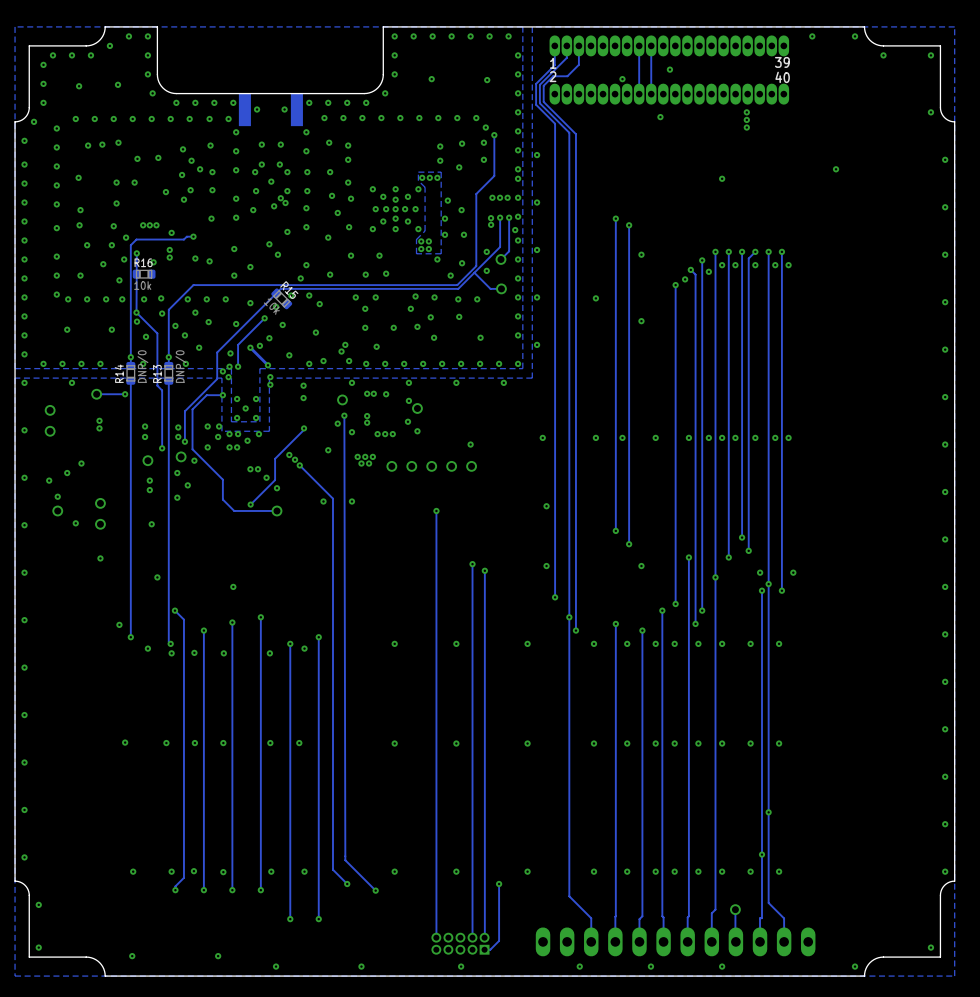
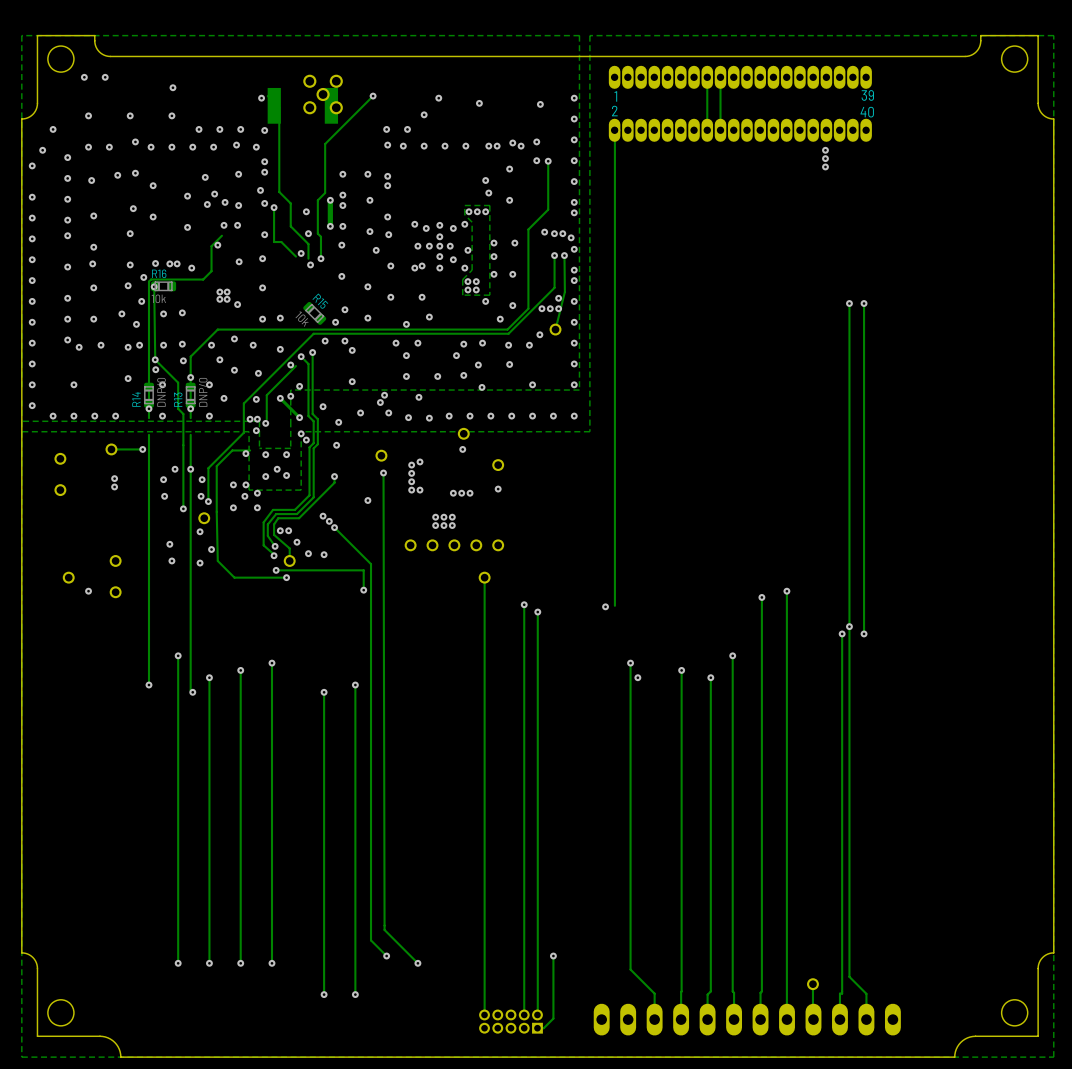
drawing: [14, 26, 956, 977] -> none
via: (128, 36) -> none
via: (147, 36) -> none
via: (394, 36) -> none
via: (413, 36) -> none
via: (432, 36) -> none
via: (451, 36) -> none
via: (470, 36) -> none
via: (489, 36) -> none
via: (508, 36) -> none
via: (812, 36) -> none
via: (855, 36) -> none
via: (109, 45) -> none
zone outline: (522, 45) (522, 26) (15, 26) (15, 45) -> (579, 35) (21, 35)
track: (554, 45) (554, 65) (536, 83) (536, 104) (555, 123) (555, 132) -> none
track: (566, 45) (566, 57) (539, 84) (539, 103) (569, 132) (569, 617) -> none
track: (578, 45) (578, 64) (567, 76) (553, 76) (543, 85) (543, 101) (575, 134) (575, 630) -> none
track: (639, 45) (639, 83) -> (707, 88) (707, 130)
track: (651, 45) (651, 83) -> (720, 88) (720, 130)
zone outline: (954, 45) (954, 26) (532, 26) (532, 45) -> (1053, 35) (589, 35)
via: (52, 55) -> none
via: (71, 55) -> none
via: (90, 55) -> none
via: (147, 55) -> none
via: (394, 55) -> none
via: (518, 55) -> none
via: (883, 55) -> none
via: (930, 55) -> none
via: (43, 64) -> none
via: (669, 69) -> none
part position: (669, 70) -> (740, 103)
via: (147, 74) -> none
via: (394, 74) -> none
via: (518, 74) -> none
via: (431, 79) -> none
via: (622, 79) -> none
via: (487, 80) -> none
via: (43, 83) -> none
via: none -> (84, 77)
via: none -> (105, 77)
via: (118, 84) -> none
via: (79, 86) -> none
via: (385, 93) -> none
via: (518, 93) -> none
part: none -> (323, 94)
track: none -> (267, 96) (279, 107) (279, 191) (290, 203) (290, 226) (308, 244) (308, 258)
track: none -> (373, 96) (325, 144) (325, 193) (317, 200) (317, 233) (320, 236) (320, 258)
via: none -> (373, 96)
via: (43, 102) -> none
via: (176, 102) -> none
via: (195, 102) -> none
via: (214, 102) -> none
via: (309, 102) -> none
via: (328, 102) -> none
via: (347, 102) -> none
via: (366, 102) -> none
via: none -> (438, 98)
via: none -> (574, 98)
via: none -> (479, 103)
via: none -> (540, 104)
via: (257, 109) -> none
via: (284, 109) -> none
via: (518, 112) -> none
via: (746, 112) -> none
via: (930, 112) -> none
via: (660, 117) -> none
via: (94, 118) -> none
via: (132, 118) -> none
via: (170, 118) -> none
via: (189, 118) -> none
via: (209, 118) -> none
via: (228, 118) -> none
via: (324, 118) -> none
via: (343, 118) -> none
via: (362, 118) -> none
via: (400, 118) -> none
via: (419, 118) -> none
via: (438, 118) -> none
via: (457, 118) -> none
via: (476, 118) -> none
via: (746, 119) -> none
via: (34, 121) -> none
via: none -> (574, 119)
via: (485, 127) -> none
via: (746, 127) -> none
via: (56, 128) -> none
via: none -> (53, 129)
via: none -> (199, 129)
via: none -> (219, 129)
via: none -> (240, 129)
via: none -> (386, 129)
via: none -> (407, 129)
via: (518, 131) -> none
via: (306, 132) -> none
track: (494, 135) (494, 160) -> none
via: (494, 135) -> none
via: (24, 140) -> none
via: none -> (574, 139)
via: (329, 142) -> none
via: (102, 144) -> none
via: (261, 144) -> none
via: (280, 144) -> none
via: (88, 145) -> none
via: none -> (403, 146)
via: none -> (424, 146)
via: none -> (445, 146)
via: none -> (465, 146)
via: none -> (497, 146)
via: none -> (521, 146)
via: (56, 147) -> none
via: none -> (88, 147)
via: none -> (109, 147)
via: none -> (151, 147)
via: none -> (171, 147)
via: none -> (192, 147)
via: none -> (213, 147)
via: none -> (256, 147)
via: (183, 149) -> none
via: none -> (42, 150)
via: (518, 150) -> none
via: none -> (825, 150)
via: (236, 151) -> none
via: (306, 151) -> none
via: (537, 155) -> none
via: none -> (67, 157)
via: (158, 157) -> none
via: none -> (825, 158)
via: (137, 158) -> none
via: (348, 159) -> none
via: none -> (574, 160)
via: (945, 159) -> none
via: (191, 160) -> none
via: none -> (264, 161)
via: (440, 160) -> none
via: none -> (548, 161)
via: (261, 164) -> none
via: (279, 164) -> none
via: none -> (825, 166)
via: (56, 166) -> none
via: (200, 169) -> none
via: (518, 169) -> none
via: (836, 169) -> none
via: none -> (135, 173)
via: (255, 172) -> none
via: (287, 172) -> none
via: none -> (117, 175)
via: none -> (387, 176)
via: none -> (67, 178)
track: (494, 175) (476, 193) (476, 222) -> (548, 178) (548, 209) (528, 229)
via: (422, 177) -> none
via: (429, 177) -> none
via: (722, 178) -> none
via: (271, 181) -> none
via: (116, 182) -> none
via: (24, 183) -> none
via: (56, 185) -> none
via: none -> (260, 190)
via: (372, 189) -> none
via: (395, 189) -> none
via: (418, 189) -> none
via: none -> (488, 193)
via: (212, 190) -> none
via: (256, 191) -> none
via: (287, 191) -> none
via: none -> (32, 197)
via: none -> (67, 199)
track: none -> (330, 200) (330, 226)
via: none -> (330, 200)
via: none -> (509, 200)
via: (383, 196) -> none
via: (407, 196) -> none
via: none -> (225, 202)
via: (492, 197) -> none
via: (500, 197) -> none
via: (507, 197) -> none
via: (280, 198) -> none
via: (351, 198) -> none
via: (395, 199) -> none
via: none -> (238, 205)
via: none -> (342, 205)
zone outline: (441, 200) (441, 172) (418, 172) (418, 180) (425, 187) (425, 215) -> (489, 205) (464, 205) (464, 214) (472, 222)
via: (447, 200) -> none
via: (24, 202) -> none
track: none -> (274, 207) (274, 242) (281, 242) (295, 256)
via: none -> (274, 207)
via: (285, 202) -> none
via: (537, 202) -> none
via: (56, 204) -> none
via: none -> (468, 211)
via: none -> (477, 211)
via: none -> (485, 211)
via: none -> (574, 212)
via: (945, 207) -> none
via: (306, 208) -> none
via: (375, 209) -> none
via: (386, 209) -> none
via: (395, 209) -> none
via: (405, 209) -> none
via: (415, 209) -> none
via: (253, 210) -> none
via: (461, 210) -> none
via: none -> (153, 216)
via: none -> (387, 216)
via: none -> (32, 218)
via: (337, 212) -> none
via: none -> (67, 220)
via: (518, 216) -> none
via: (236, 217) -> none
via: none -> (414, 224)
via: none -> (464, 224)
track: (500, 217) (500, 246) -> none
via: (500, 217) -> none
track: (509, 217) (509, 251) (500, 259) -> none
via: (509, 217) -> none
via: none -> (224, 225)
via: (444, 218) -> none
via: (491, 218) -> none
track: (615, 218) (615, 530) -> none
via: (615, 218) -> none
via: none -> (330, 226)
via: none -> (342, 226)
via: none -> (187, 227)
via: (24, 221) -> none
via: none -> (369, 231)
via: (79, 225) -> none
via: (143, 225) -> none
via: (149, 225) -> none
via: (156, 225) -> none
track: (629, 225) (629, 544) -> none
via: (629, 225) -> none
via: none -> (308, 233)
via: none -> (554, 233)
via: none -> (562, 233)
via: none -> (264, 234)
via: (306, 227) -> none
via: (372, 229) -> none
via: (418, 229) -> none
via: none -> (32, 238)
zone outline: (425, 230) (416, 239) (416, 253) (441, 253) -> (472, 238) (472, 270) (462, 279) (462, 295) (489, 295) (489, 263)
via: (287, 231) -> none
via: (171, 232) -> none
track: (193, 236) (186, 236) (183, 239) (136, 239) (130, 245) (130, 269) -> (221, 235) (211, 246) (211, 271) (203, 279) (151, 279) (148, 281)
via: none -> (341, 245)
via: (126, 237) -> none
via: (328, 237) -> none
via: none -> (417, 246)
via: none -> (429, 246)
via: none -> (439, 246)
via: none -> (450, 246)
via: none -> (93, 247)
via: (24, 240) -> none
via: none -> (376, 250)
via: (428, 241) -> none
via: (87, 245) -> none
via: (111, 245) -> none
via: none -> (554, 255)
track: none -> (564, 255) (564, 292) (555, 329)
via: none -> (564, 255)
via: none -> (439, 256)
via: none -> (494, 256)
track: (500, 247) (458, 288) (280, 288) (217, 352) (217, 379) (184, 411) (184, 439) -> (554, 256) (554, 287) (508, 333) (313, 333) (243, 403) (243, 432) (208, 468)
via: none -> (32, 259)
via: (169, 249) -> none
via: none -> (320, 258)
via: none -> (453, 259)
via: (421, 249) -> none
via: (428, 249) -> none
via: (537, 249) -> none
via: none -> (239, 261)
via: (486, 251) -> none
track: (715, 251) (715, 909) (711, 913) (711, 941) -> (786, 591) (786, 1019)
via: (715, 251) -> none
track: (728, 251) (728, 557) -> none
via: (728, 251) -> none
track: (742, 251) (742, 537) -> none
via: (742, 251) -> none
track: (755, 251) (748, 258) (748, 550) -> none
via: (755, 251) -> none
track: (768, 251) (768, 289) -> none
via: (768, 251) -> none
track: (781, 251) (781, 289) -> none
via: (781, 251) -> none
via: none -> (92, 263)
track: (136, 253) (136, 312) (157, 333) (157, 361) -> (154, 286) (155, 359) (178, 382)
via: none -> (169, 263)
via: none -> (177, 263)
via: none -> (130, 264)
via: (641, 254) -> none
via: (945, 254) -> none
via: none -> (414, 268)
via: none -> (439, 268)
via: none -> (464, 268)
via: (195, 258) -> none
via: (24, 259) -> none
via: (124, 259) -> none
via: (437, 259) -> none
part: (500, 259) -> none
track: (702, 260) (702, 610) -> none
via: (702, 260) -> none
via: (209, 261) -> none
via: (153, 262) -> none
via: none -> (494, 274)
via: (103, 264) -> none
via: (722, 265) -> none
via: (735, 265) -> none
via: (755, 265) -> none
via: (775, 265) -> none
via: (788, 265) -> none
via: none -> (143, 277)
track: (476, 266) (457, 285) (193, 285) (168, 309) (168, 338) -> (528, 277) (528, 308) (507, 329) (217, 329) (190, 356)
via: (250, 267) -> none
via: none -> (32, 280)
via: none -> (574, 280)
via: none -> (467, 281)
via: none -> (476, 281)
track: (690, 269) (695, 274) (695, 623) -> none
via: (690, 269) -> none
via: (486, 270) -> none
via: (708, 271) -> none
track: (474, 272) (490, 288) (501, 288) -> none
via: none -> (128, 285)
via: (386, 273) -> none
via: none -> (154, 286)
via: (365, 274) -> none
via: (56, 275) -> none
via: (450, 275) -> none
via: none -> (467, 289)
via: none -> (476, 289)
via: (24, 278) -> none
via: (300, 278) -> none
via: (518, 278) -> none
via: none -> (219, 292)
via: none -> (227, 292)
via: (685, 279) -> none
via: (119, 280) -> none
via: none -> (390, 297)
via: none -> (422, 297)
via: none -> (67, 298)
via: none -> (558, 298)
track: (675, 285) (675, 604) -> none
via: (675, 285) -> none
via: none -> (219, 299)
via: none -> (227, 299)
via: none -> (32, 301)
via: none -> (141, 301)
via: none -> (485, 301)
via: none -> (574, 301)
part position: (501, 288) -> (555, 329)
via: none -> (849, 303)
via: none -> (864, 303)
via: none -> (237, 304)
via: none -> (512, 305)
via: (56, 294) -> none
via: none -> (541, 308)
via: none -> (550, 308)
via: none -> (558, 308)
via: (291, 295) -> none
via: (415, 296) -> none
via: (24, 297) -> none
via: (355, 297) -> none
via: (375, 297) -> none
via: (434, 297) -> none
via: (518, 297) -> none
via: (537, 297) -> none
via: (595, 298) -> none
via: (68, 299) -> none
via: (87, 299) -> none
via: (122, 299) -> none
via: (187, 299) -> none
via: (206, 299) -> none
via: (225, 299) -> none
via: (458, 299) -> none
via: (477, 299) -> none
via: none -> (429, 317)
via: (945, 302) -> none
via: none -> (367, 318)
via: none -> (67, 319)
via: none -> (93, 319)
via: none -> (262, 319)
via: (319, 304) -> none
via: none -> (500, 319)
via: none -> (32, 322)
via: (276, 306) -> none
via: none -> (335, 322)
via: none -> (574, 322)
via: none -> (136, 324)
via: (410, 308) -> none
via: (136, 312) -> none
via: (195, 312) -> none
via: (162, 313) -> none
via: (24, 316) -> none
via: (459, 316) -> none
via: (518, 316) -> none
via: (430, 317) -> none
track: (264, 318) (238, 344) (238, 366) -> (295, 366) (266, 395) (266, 419)
via: (264, 318) -> none
via: none -> (539, 334)
via: (136, 321) -> none
via: (641, 321) -> none
via: none -> (67, 339)
via: (236, 324) -> none
via: (282, 324) -> none
via: none -> (325, 341)
via: none -> (344, 341)
via: none -> (32, 343)
via: (175, 325) -> none
via: none -> (396, 343)
via: none -> (417, 343)
via: none -> (482, 343)
via: none -> (574, 343)
via: none -> (182, 344)
via: none -> (101, 345)
via: none -> (139, 345)
via: none -> (163, 345)
via: none -> (211, 345)
via: none -> (253, 345)
via: (365, 327) -> none
via: (393, 327) -> none
via: none -> (508, 345)
via: none -> (529, 345)
via: none -> (280, 349)
track: none -> (312, 352) (312, 414) (317, 419) (317, 444) (313, 448) (313, 497) (297, 514) (276, 514) (267, 524) (267, 535) (275, 546)
via: none -> (312, 352)
via: (24, 335) -> none
via: (184, 335) -> none
via: (518, 335) -> none
via: (146, 336) -> none
via: none -> (406, 355)
via: none -> (456, 355)
via: (434, 337) -> none
via: (480, 337) -> none
via: none -> (155, 359)
via: none -> (219, 359)
track: none -> (304, 359) (308, 363) (308, 416) (313, 421) (313, 443) (309, 447) (309, 495) (294, 509) (273, 509) (263, 522) (263, 545) (274, 555)
via: none -> (183, 360)
via: none -> (32, 363)
via: (345, 344) -> none
via: none -> (574, 363)
via: (537, 344) -> none
via: none -> (478, 365)
via: none -> (509, 364)
via: (376, 346) -> none
via: (199, 347) -> none
track: (250, 347) (267, 365) -> (280, 398) (299, 417)
via: (250, 347) -> none
via: (945, 349) -> none
via: none -> (155, 369)
via: none -> (234, 370)
via: (341, 351) -> none
via: (24, 354) -> none
via: (289, 355) -> none
via: none -> (463, 375)
via: none -> (406, 376)
via: none -> (437, 376)
via: (130, 357) -> none
via: none -> (128, 378)
via: none -> (352, 381)
via: (323, 361) -> none
via: (349, 361) -> none
via: none -> (32, 384)
via: (43, 363) -> none
via: (81, 363) -> none
via: (100, 363) -> none
via: (309, 363) -> none
via: (366, 363) -> none
via: (385, 363) -> none
via: (404, 363) -> none
via: (423, 363) -> none
via: (442, 363) -> none
via: (461, 363) -> none
via: (499, 363) -> none
via: (229, 366) -> none
via: (238, 366) -> none
via: none -> (482, 387)
zone outline: (15, 368) (231, 368) (231, 397) -> (21, 421) (259, 421)
via: (222, 371) -> none
via: none -> (384, 395)
via: none -> (290, 396)
via: none -> (418, 397)
via: none -> (224, 398)
via: none -> (280, 398)
via: (270, 377) -> none
zone outline: (15, 378) (221, 378) (221, 406) -> (21, 431) (249, 431)
zone outline: (532, 378) (269, 378) (269, 406) -> (589, 400) (589, 431) (301, 431)
via: none -> (380, 402)
via: (71, 382) -> none
via: (351, 382) -> none
via: (408, 382) -> none
via: (456, 382) -> none
via: (503, 382) -> none
via: none -> (323, 406)
via: (270, 384) -> none
via: none -> (148, 408)
via: none -> (190, 408)
via: (303, 385) -> none
via: none -> (360, 412)
via: none -> (388, 412)
via: none -> (53, 416)
via: none -> (73, 416)
via: none -> (94, 416)
via: none -> (115, 416)
via: none -> (162, 416)
via: none -> (209, 416)
via: none -> (449, 416)
via: none -> (470, 416)
via: none -> (490, 416)
via: none -> (511, 416)
via: none -> (532, 416)
via: none -> (553, 416)
via: none -> (574, 416)
via: none -> (299, 417)
via: (373, 393) -> none
part: (96, 394) -> none
track: (125, 394) (96, 394) -> (142, 449) (111, 449)
via: (125, 394) -> none
track: (130, 394) (130, 409) -> (148, 386) (148, 403)
track: (168, 394) (168, 409) -> (190, 386) (190, 403)
track: (222, 395) (206, 395) (192, 409) (192, 437) -> (250, 450) (232, 450) (216, 466)
via: none -> (257, 419)
via: (945, 397) -> none
via: (256, 398) -> none
part position: (342, 399) -> (381, 455)
via: (408, 400) -> none
via: none -> (256, 430)
via: (245, 408) -> none
via: none -> (301, 433)
part: (50, 410) -> none
via: none -> (306, 440)
track: (344, 415) (345, 856) -> (383, 472) (384, 925)
via: (344, 415) -> none
via: (367, 416) -> none
via: (237, 417) -> none
via: (256, 417) -> none
via: none -> (336, 445)
via: (99, 420) -> none
via: (407, 421) -> none
part: none -> (111, 449)
via: none -> (142, 449)
via: (367, 422) -> none
via: none -> (462, 449)
via: (337, 423) -> none
via: (145, 426) -> none
via: (207, 426) -> none
via: (178, 427) -> none
via: none -> (265, 454)
via: none -> (286, 454)
via: (99, 428) -> none
track: (304, 428) (275, 458) (275, 480) (250, 504) -> none
via: (304, 428) -> none
via: (24, 430) -> none
zone outline: (269, 431) (221, 431) -> (301, 458) (301, 490) (249, 490) (249, 458)
via: (417, 431) -> none
via: (351, 432) -> none
via: (229, 434) -> none
via: (238, 434) -> none
via: (258, 434) -> none
via: (385, 434) -> none
via: (392, 434) -> none
via: (145, 436) -> none
via: (178, 436) -> none
via: (218, 436) -> none
via: none -> (411, 465)
part: none -> (498, 465)
via: (542, 437) -> none
via: (595, 437) -> none
via: (622, 437) -> none
via: (655, 437) -> none
via: (688, 437) -> none
via: (708, 437) -> none
via: (722, 437) -> none
via: (735, 437) -> none
via: (755, 437) -> none
via: (775, 437) -> none
via: (788, 437) -> none
via: none -> (175, 469)
via: none -> (190, 469)
track: none -> (208, 470) (208, 501)
via: (184, 441) -> none
via: none -> (383, 472)
via: none -> (411, 473)
via: (470, 444) -> none
via: (945, 444) -> none
via: none -> (286, 475)
via: (207, 447) -> none
via: (229, 447) -> none
track: none -> (334, 476) (334, 482) (299, 518) (278, 518) (274, 524) (274, 534) (289, 548) (289, 560)
via: none -> (334, 476)
track: none -> (183, 477) (183, 508)
via: (162, 448) -> none
via: none -> (114, 478)
track: (192, 449) (222, 479) (222, 499) (234, 510) (276, 510) -> (216, 478) (217, 560) (234, 577) (286, 577)
via: none -> (163, 479)
via: none -> (202, 479)
via: (328, 450) -> none
via: none -> (411, 481)
via: none -> (233, 484)
via: none -> (245, 484)
via: (289, 454) -> none
via: none -> (114, 486)
part: (181, 456) -> none
via: (357, 456) -> none
via: (365, 456) -> none
via: (372, 456) -> none
via: none -> (498, 489)
part: none -> (60, 490)
via: (295, 459) -> none
via: none -> (411, 490)
via: none -> (420, 490)
part: (147, 460) -> none
via: (194, 460) -> none
via: none -> (257, 493)
via: none -> (453, 493)
via: none -> (461, 493)
via: none -> (470, 493)
via: (81, 463) -> none
via: (361, 463) -> none
via: (369, 463) -> none
via: none -> (164, 496)
via: none -> (201, 496)
via: none -> (244, 496)
track: (299, 465) (332, 498) (332, 527) -> (334, 527) (371, 564)
via: (299, 465) -> none
part: (391, 466) -> none
part: (411, 466) -> none
part: (431, 466) -> none
part: (451, 466) -> none
part: (471, 466) -> none
via: (250, 469) -> none
via: (258, 469) -> none
via: none -> (367, 500)
via: none -> (208, 501)
via: (67, 473) -> none
via: (177, 473) -> none
via: none -> (233, 507)
via: none -> (257, 507)
via: none -> (183, 508)
via: (24, 477) -> none
via: (266, 477) -> none
via: (49, 480) -> none
via: (149, 480) -> none
via: none -> (323, 516)
via: none -> (435, 517)
via: none -> (443, 517)
via: none -> (452, 517)
part: none -> (204, 518)
via: (187, 485) -> none
via: (276, 488) -> none
via: none -> (329, 521)
via: (149, 490) -> none
via: none -> (435, 525)
via: none -> (443, 525)
via: none -> (452, 525)
via: (945, 492) -> none
via: none -> (334, 527)
via: (57, 496) -> none
via: none -> (280, 530)
via: none -> (288, 530)
via: (323, 501) -> none
via: (351, 501) -> none
part: (100, 503) -> none
via: (250, 504) -> none
via: (546, 506) -> none
via: none -> (297, 542)
via: none -> (169, 544)
part: (57, 510) -> none
via: none -> (275, 546)
part position: (276, 510) -> (289, 560)
part: none -> (410, 545)
part: none -> (432, 545)
part: none -> (454, 545)
part: none -> (476, 545)
track: (436, 510) (436, 539) -> none
via: (436, 510) -> none
part: none -> (498, 545)
part: none -> (537, 546)
via: none -> (211, 549)
via: none -> (308, 553)
via: none -> (324, 554)
via: none -> (274, 555)
via: (75, 523) -> none
via: (24, 525) -> none
via: none -> (200, 563)
via: (615, 530) -> none
track: none -> (276, 570) (363, 570) (363, 590)
via: none -> (276, 570)
via: (742, 537) -> none
part: none -> (68, 577)
via: none -> (286, 577)
part: none -> (484, 577)
via: (945, 539) -> none
via: (629, 544) -> none
via: none -> (363, 590)
via: (748, 550) -> none
via: none -> (88, 591)
via: none -> (786, 591)
part: none -> (115, 592)
via: (728, 557) -> none
via: (100, 558) -> none
track: (555, 565) (555, 597) -> none
via: (641, 566) -> none
via: (24, 572) -> none
via: (760, 572) -> none
via: (793, 572) -> none
via: (157, 577) -> none
via: (715, 577) -> none
via: (233, 586) -> none
via: (945, 586) -> none
via: (555, 597) -> none
via: (675, 604) -> none
track: none -> (178, 655) (178, 963)
via: none -> (178, 655)
track: (174, 610) (183, 619) (183, 877) (175, 886) (175, 890) -> none
via: (174, 610) -> none
via: (702, 610) -> none
track: none -> (271, 663) (271, 963)
via: none -> (271, 663)
track: (260, 617) (260, 890) -> none
via: (260, 617) -> none
via: (24, 620) -> none
track: (232, 622) (232, 890) -> none
via: (232, 622) -> none
track: none -> (240, 670) (240, 963)
via: none -> (240, 670)
via: (695, 623) -> none
via: (119, 624) -> none
track: none -> (209, 677) (209, 963)
via: none -> (209, 677)
track: (203, 630) (203, 890) -> none
via: (203, 630) -> none
via: (945, 634) -> none
via: (394, 643) -> none
via: (456, 643) -> none
via: (527, 643) -> none
via: (594, 643) -> none
via: (627, 643) -> none
via: (655, 643) -> none
via: (674, 643) -> none
via: (698, 643) -> none
via: (722, 643) -> none
via: (750, 643) -> none
via: (779, 643) -> none
via: (147, 648) -> none
via: (304, 648) -> none
via: (194, 652) -> none
via: (171, 653) -> none
via: (223, 653) -> none
via: (269, 653) -> none
via: (24, 667) -> none
via: (945, 681) -> none
via: (24, 715) -> none
via: (945, 729) -> none
via: (125, 742) -> none
via: (166, 743) -> none
via: (194, 743) -> none
via: (223, 743) -> none
via: (270, 743) -> none
via: (299, 743) -> none
via: (394, 743) -> none
via: (456, 743) -> none
via: (527, 743) -> none
via: (594, 743) -> none
via: (627, 743) -> none
via: (655, 743) -> none
via: (674, 743) -> none
via: (698, 743) -> none
via: (722, 743) -> none
via: (750, 743) -> none
via: (779, 743) -> none
via: (24, 762) -> none
via: (945, 776) -> none
via: (24, 809) -> none
via: (768, 812) -> none
via: (945, 824) -> none
via: (762, 854) -> none
via: (24, 857) -> none
via: (133, 871) -> none
via: (171, 871) -> none
via: (193, 871) -> none
via: (271, 871) -> none
via: (304, 871) -> none
via: (394, 871) -> none
via: (456, 871) -> none
via: (527, 871) -> none
via: (594, 871) -> none
via: (627, 871) -> none
via: (655, 871) -> none
via: (674, 871) -> none
via: (698, 871) -> none
via: (722, 871) -> none
via: (750, 871) -> none
via: (779, 871) -> none
via: (945, 871) -> none
via: (223, 872) -> none
via: none -> (178, 963)
via: (175, 890) -> none
via: none -> (209, 963)
via: (203, 890) -> none
via: none -> (240, 963)
via: (232, 890) -> none
via: none -> (271, 963)
via: (260, 890) -> none
via: (38, 904) -> none
via: (38, 947) -> none
via: (930, 947) -> none
via: (132, 956) -> none
via: (218, 956) -> none
via: (276, 966) -> none
via: (361, 966) -> none
via: (461, 966) -> none
via: (579, 966) -> none
via: (650, 966) -> none
via: (722, 966) -> none
via: (855, 966) -> none

